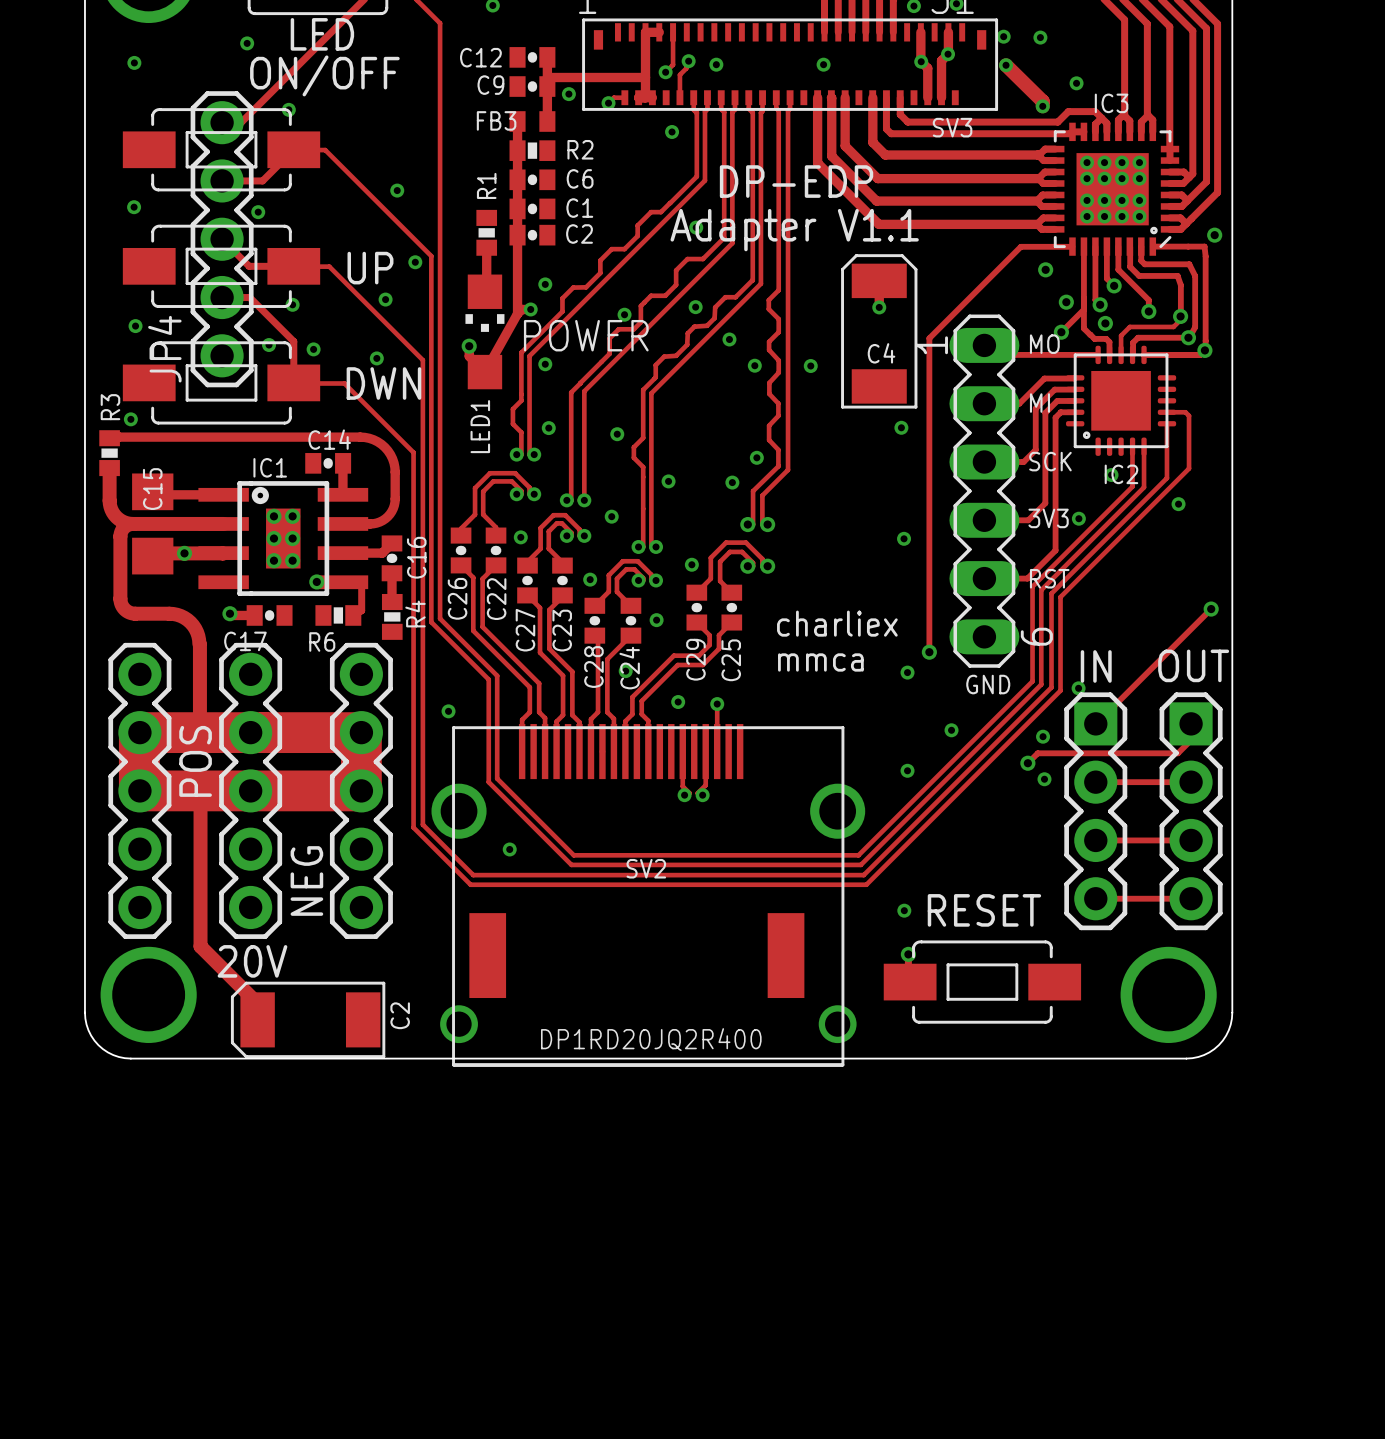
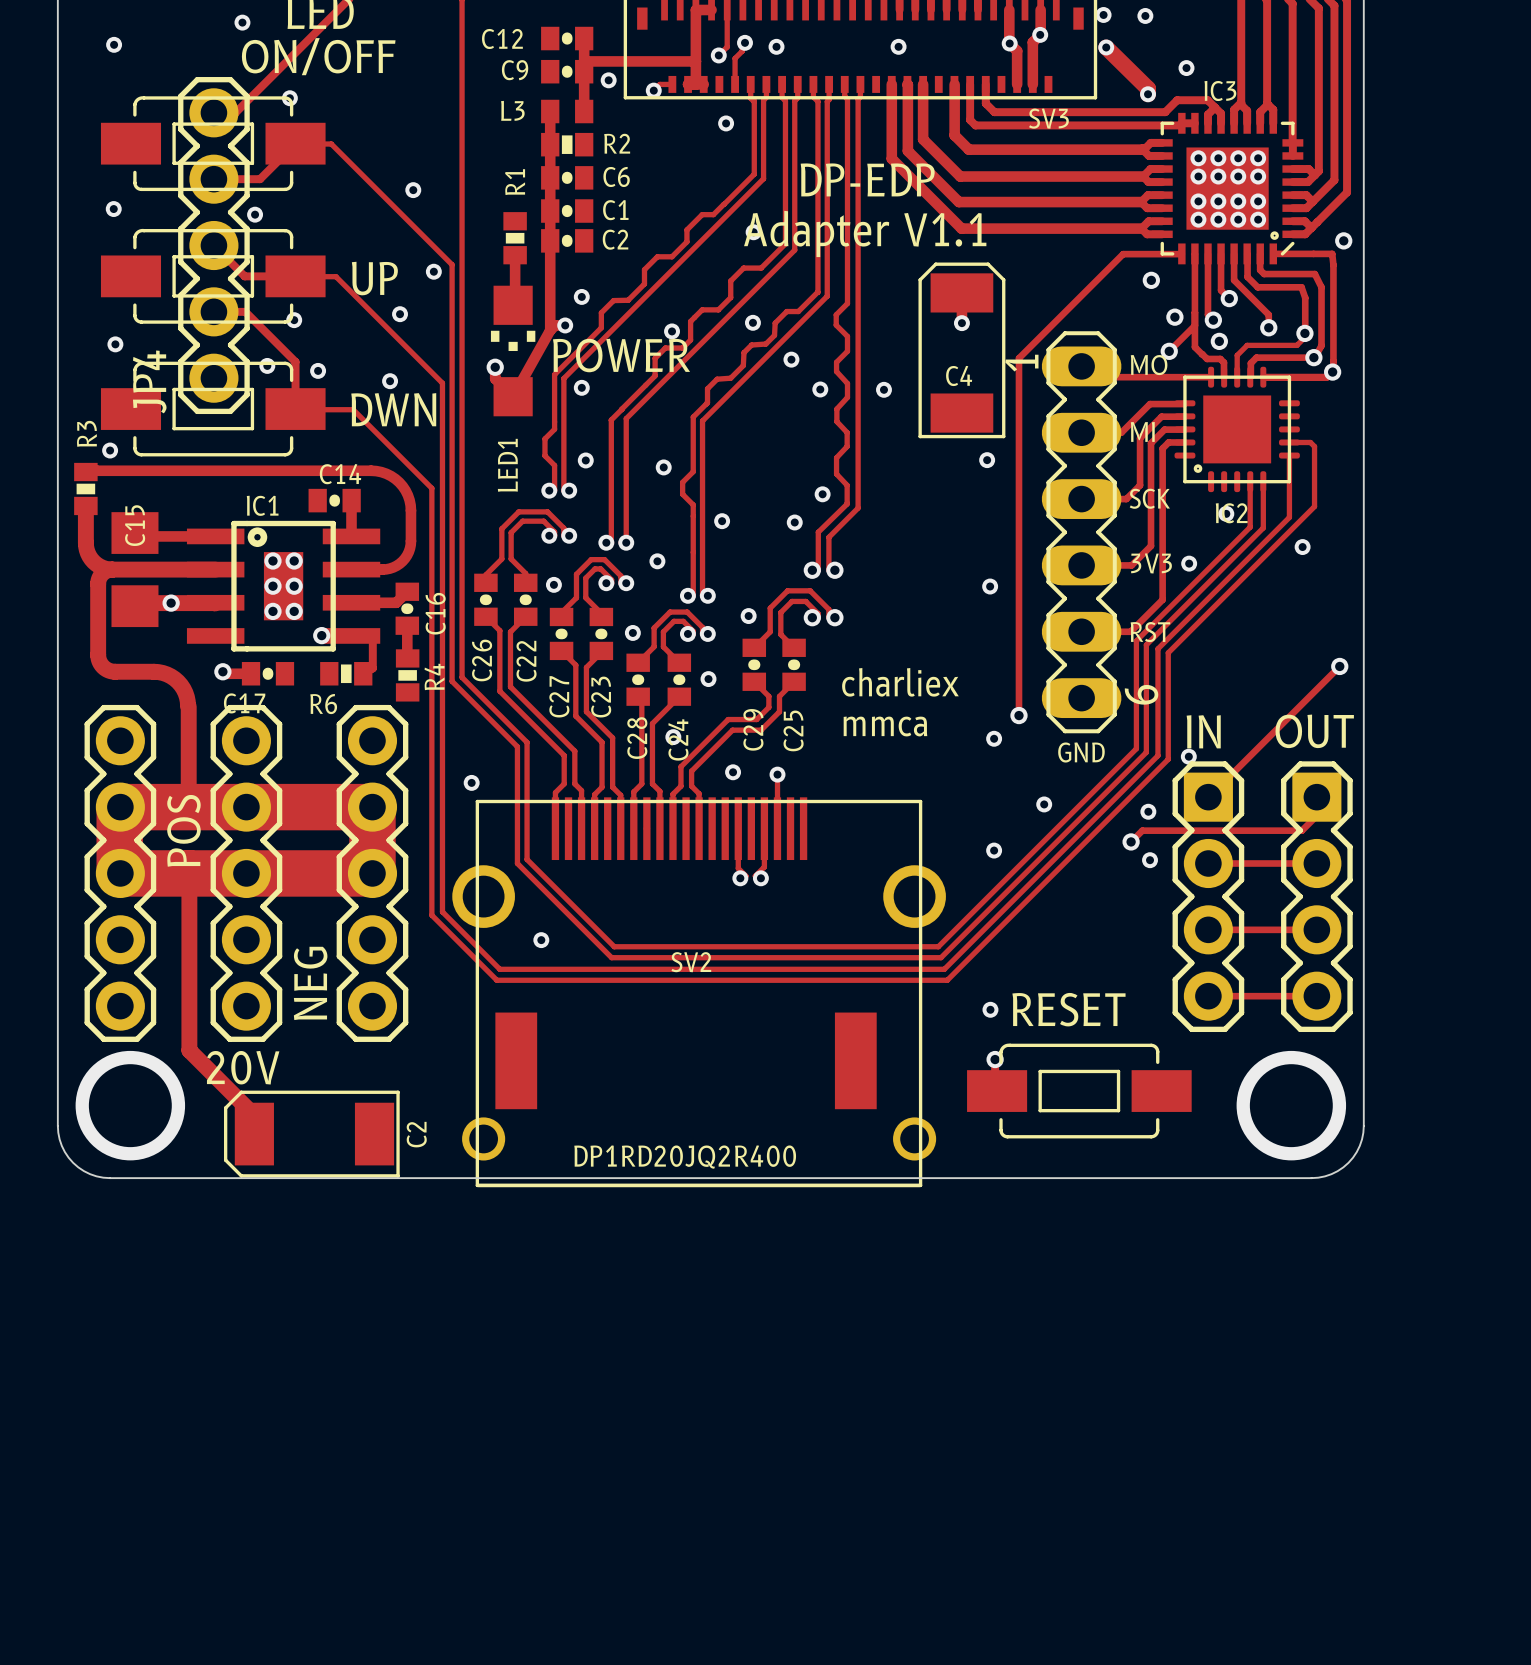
FB3 name: FB3 (496, 120) -> L3 (512, 110)

